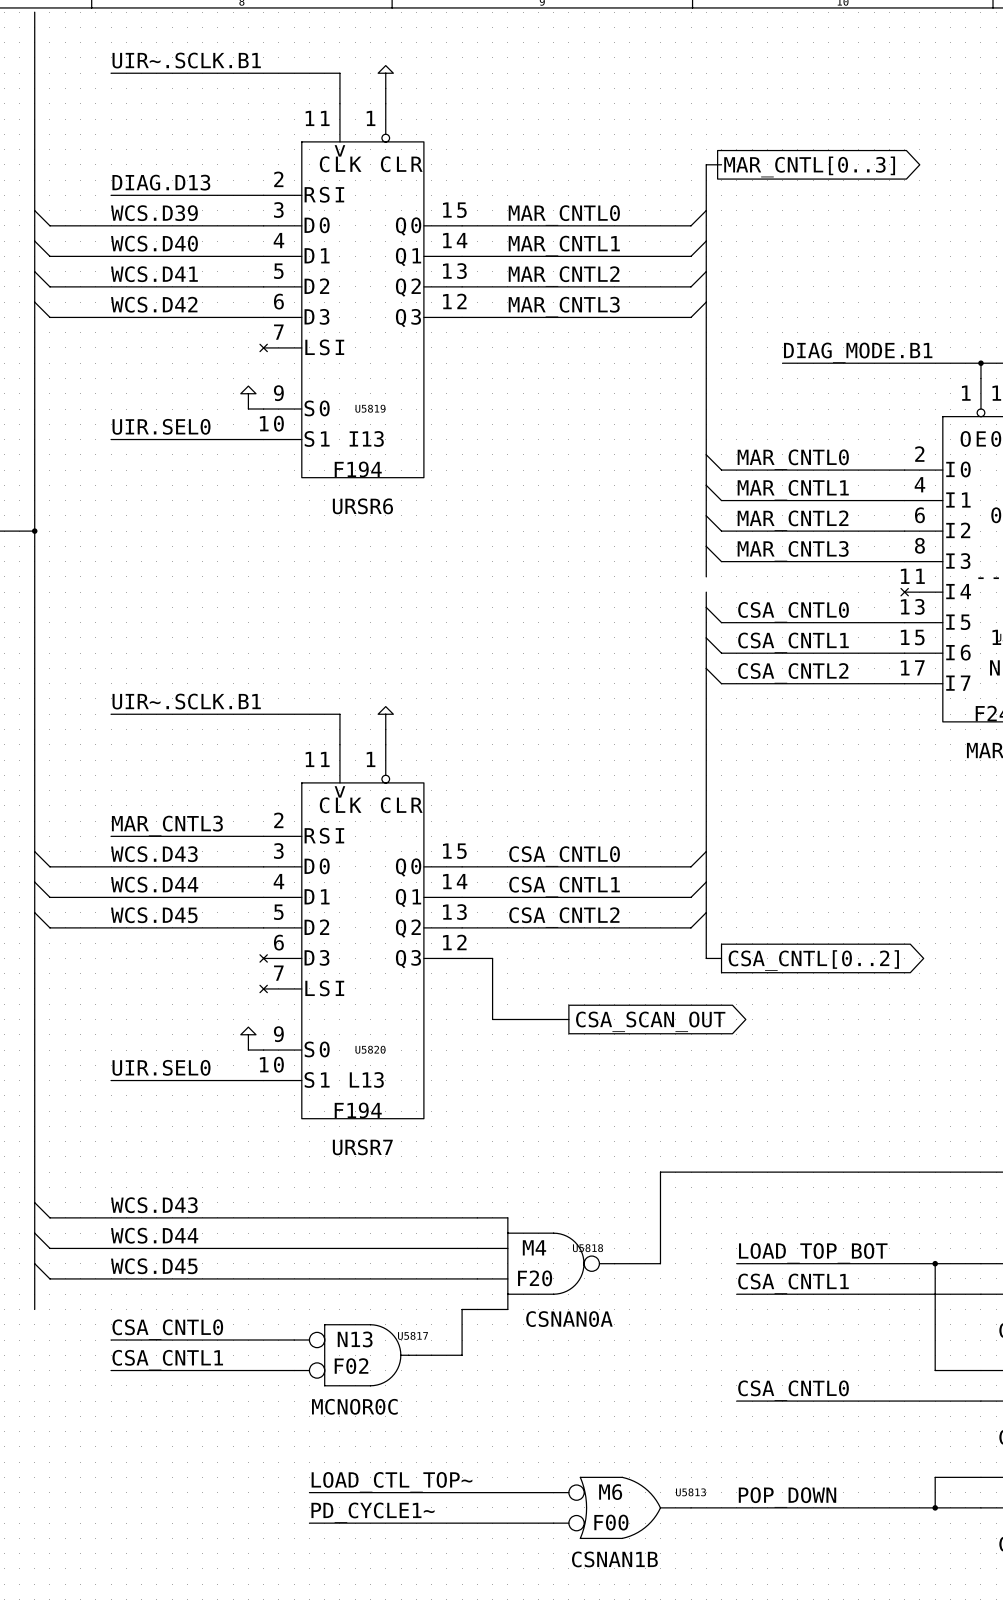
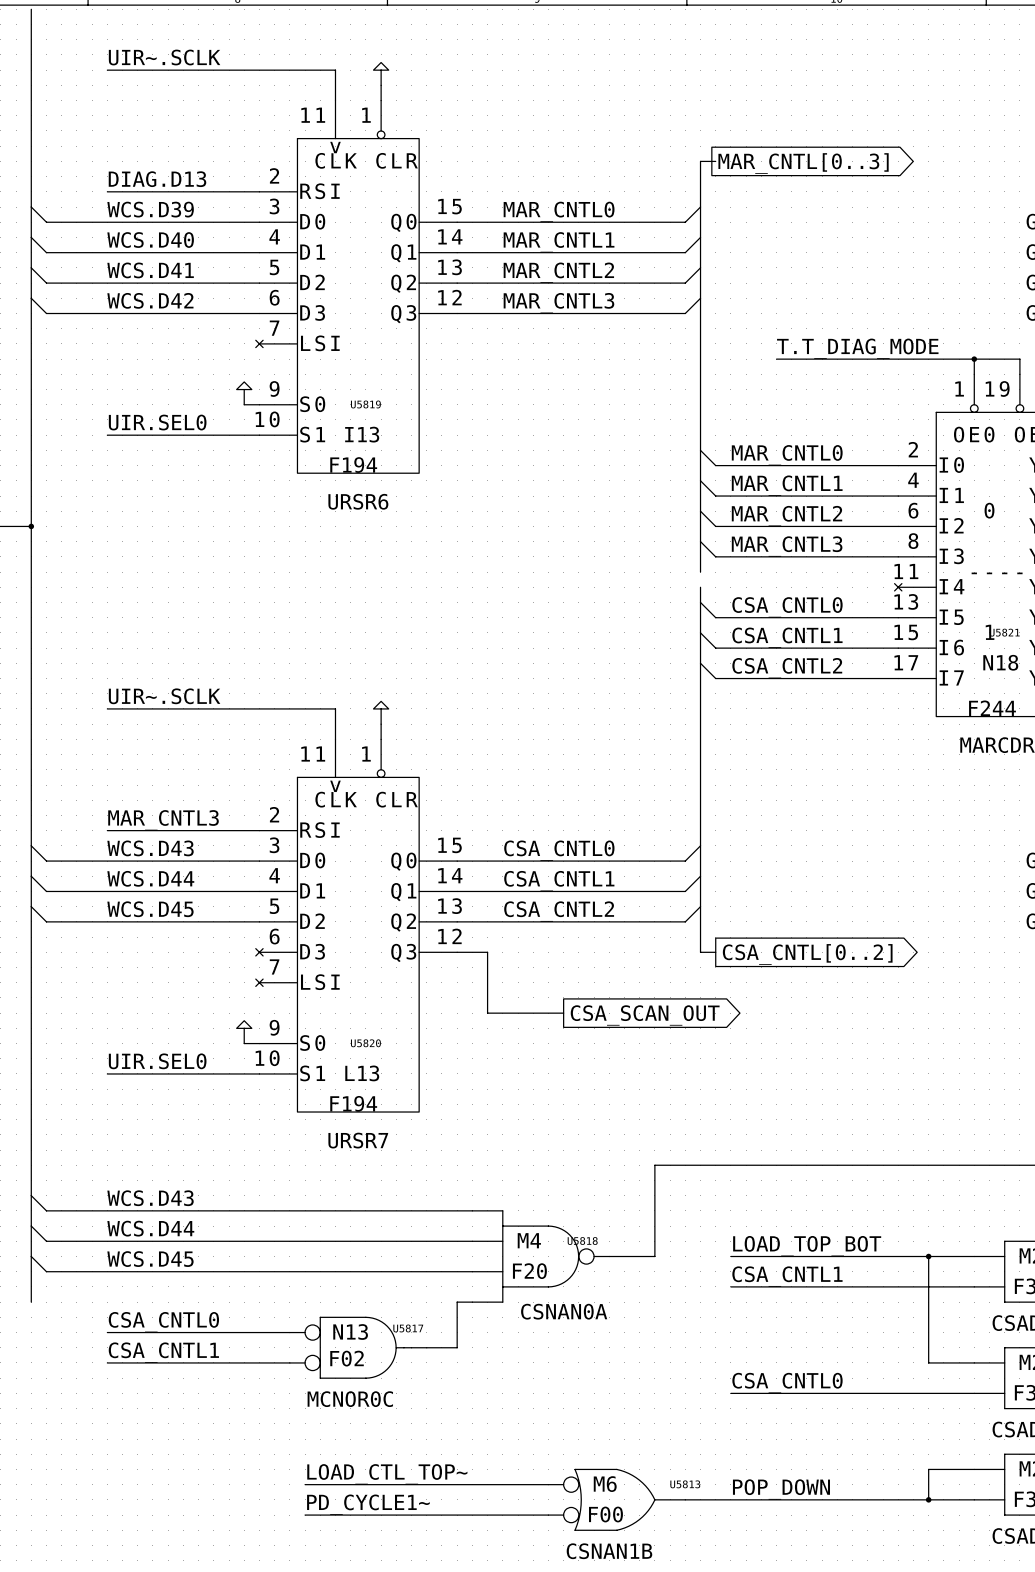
label: UIR~.SCLK.B1 (186, 60) -> UIR~.SCLK (164, 57)
label: DIAG_MODE.B1 (858, 352) -> T.T_DIAG_MODE (857, 348)
label: UIR~.SCLK.B1 (186, 701) -> UIR~.SCLK (164, 696)

